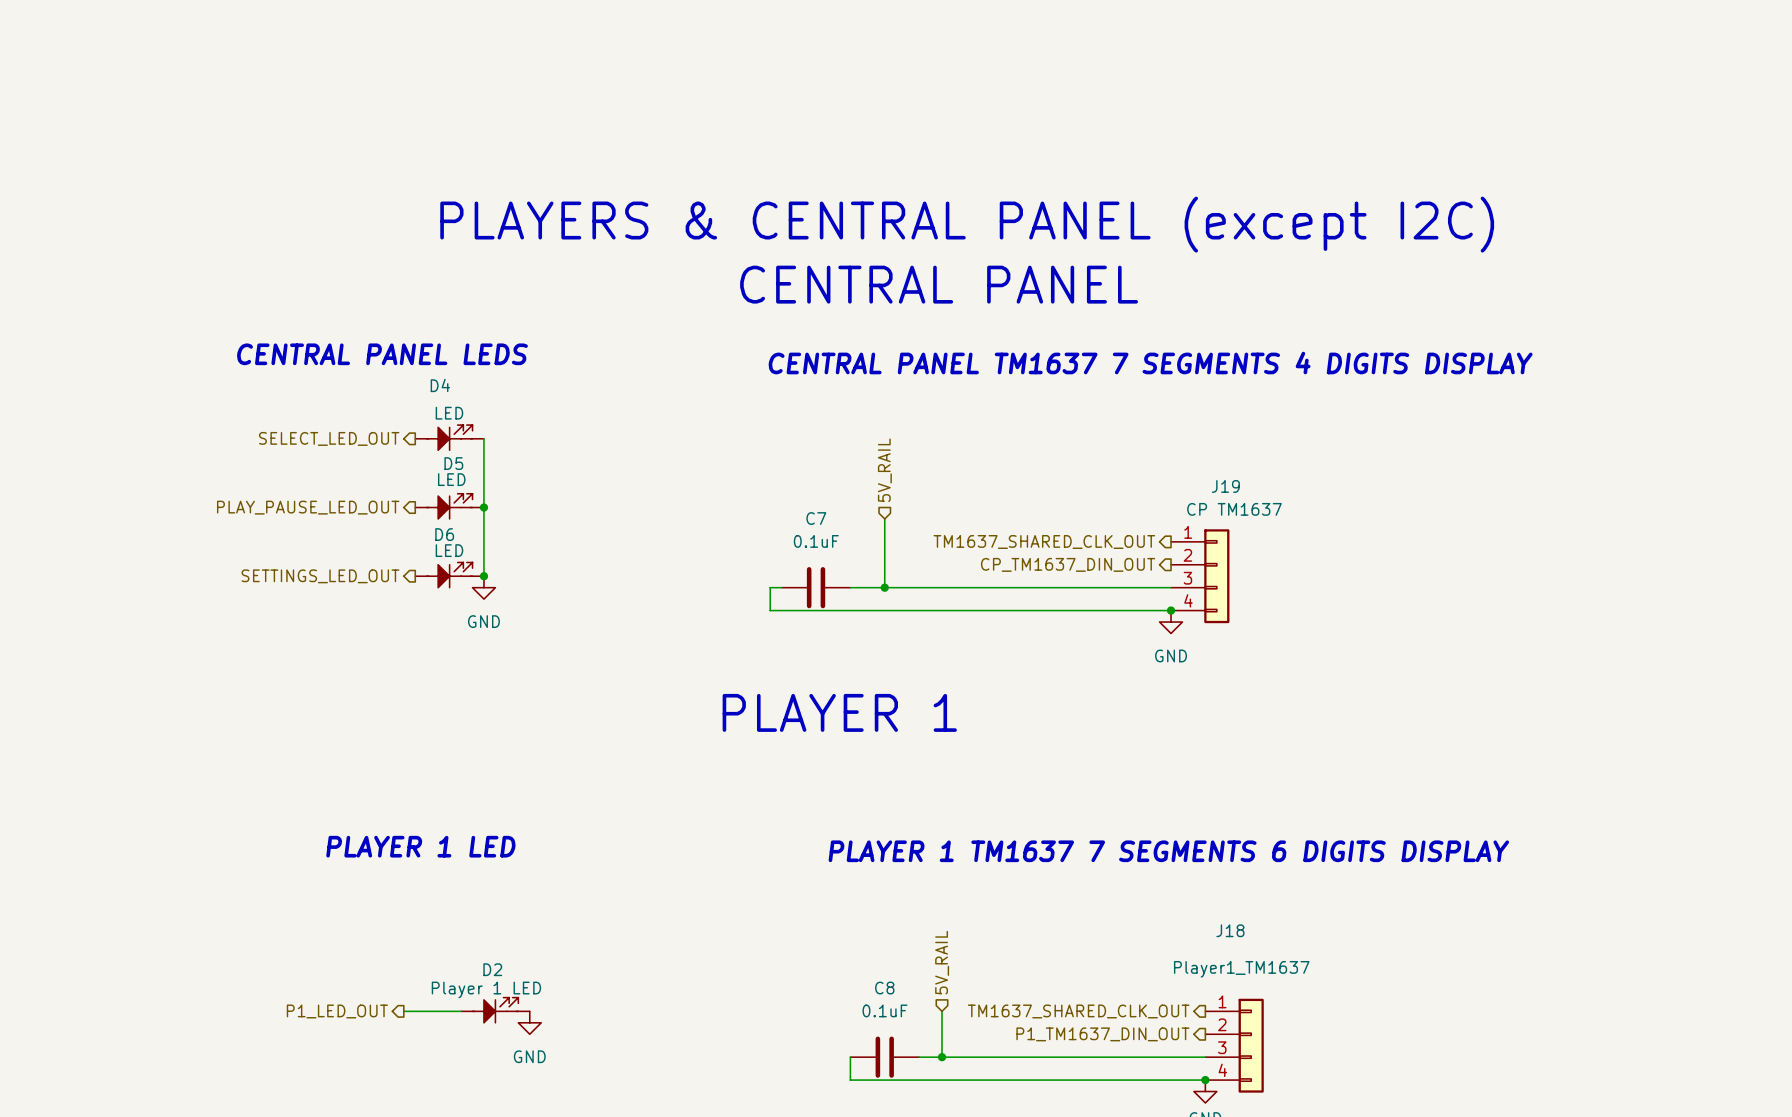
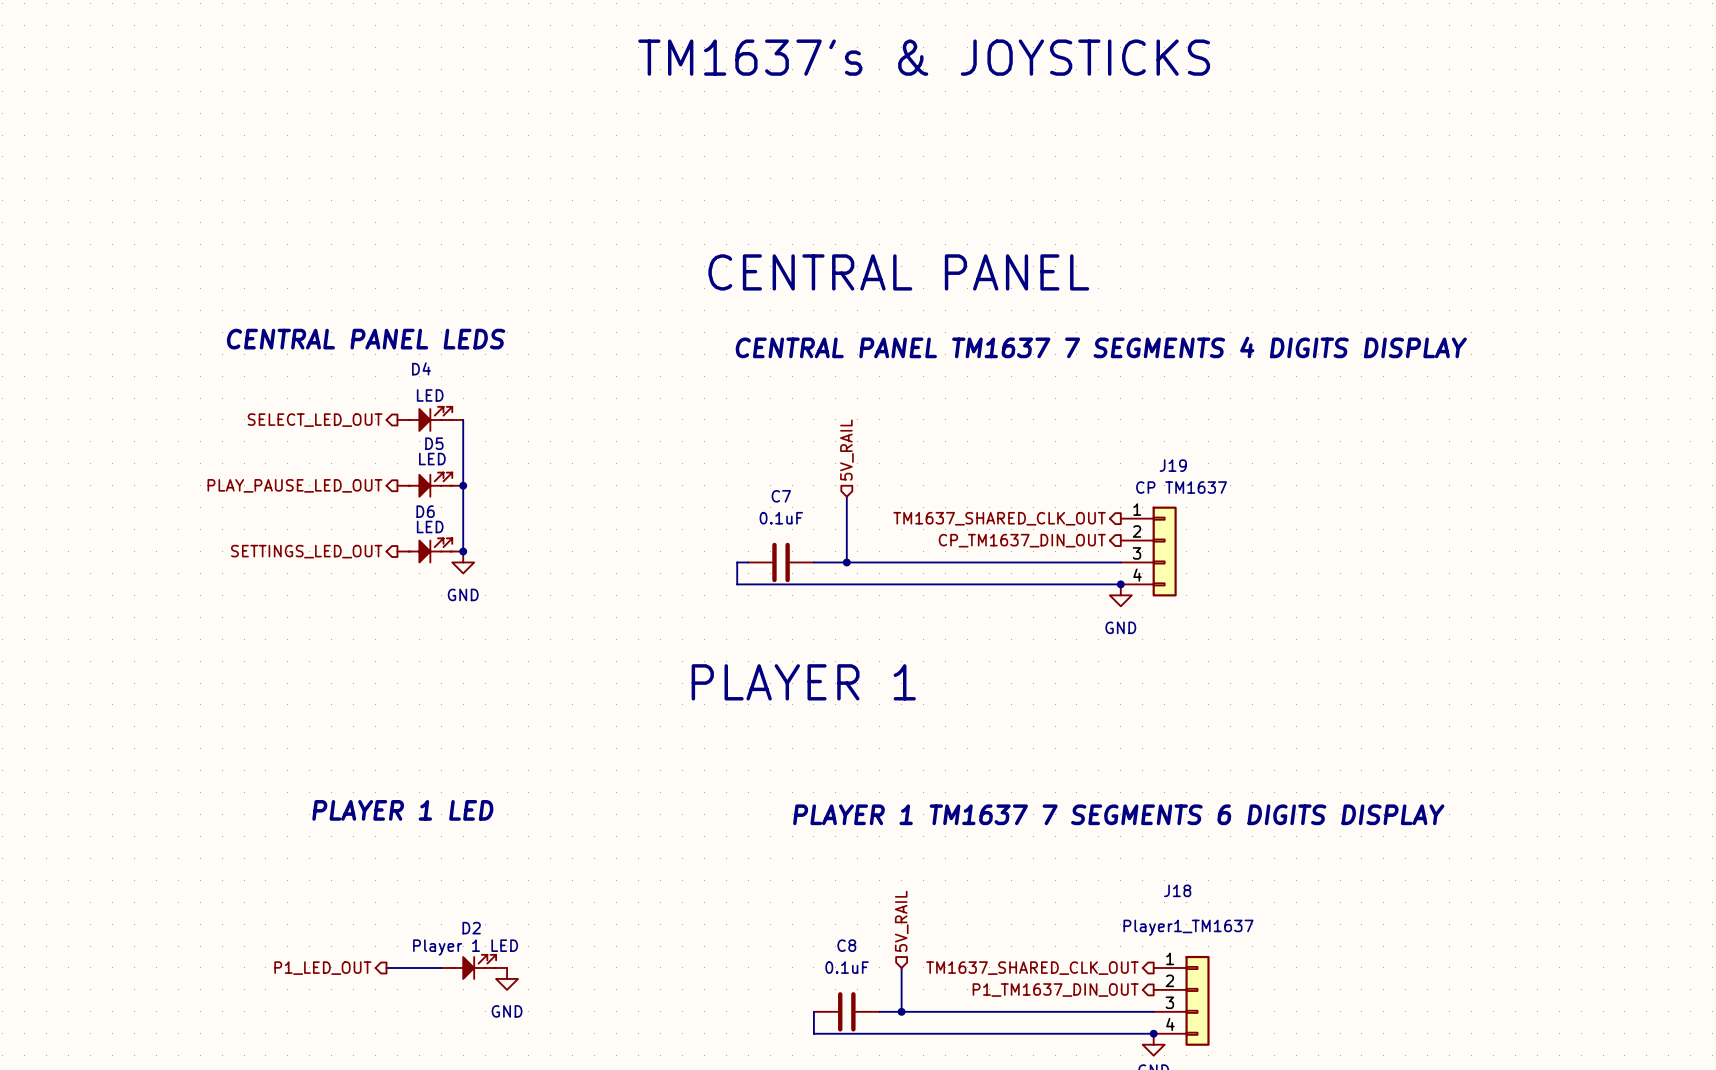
text: none -> TM1637's & JOYSTICKS (924, 57)
text: PLAYERS & CENTRAL PANEL (except I2C) (967, 224) -> none

